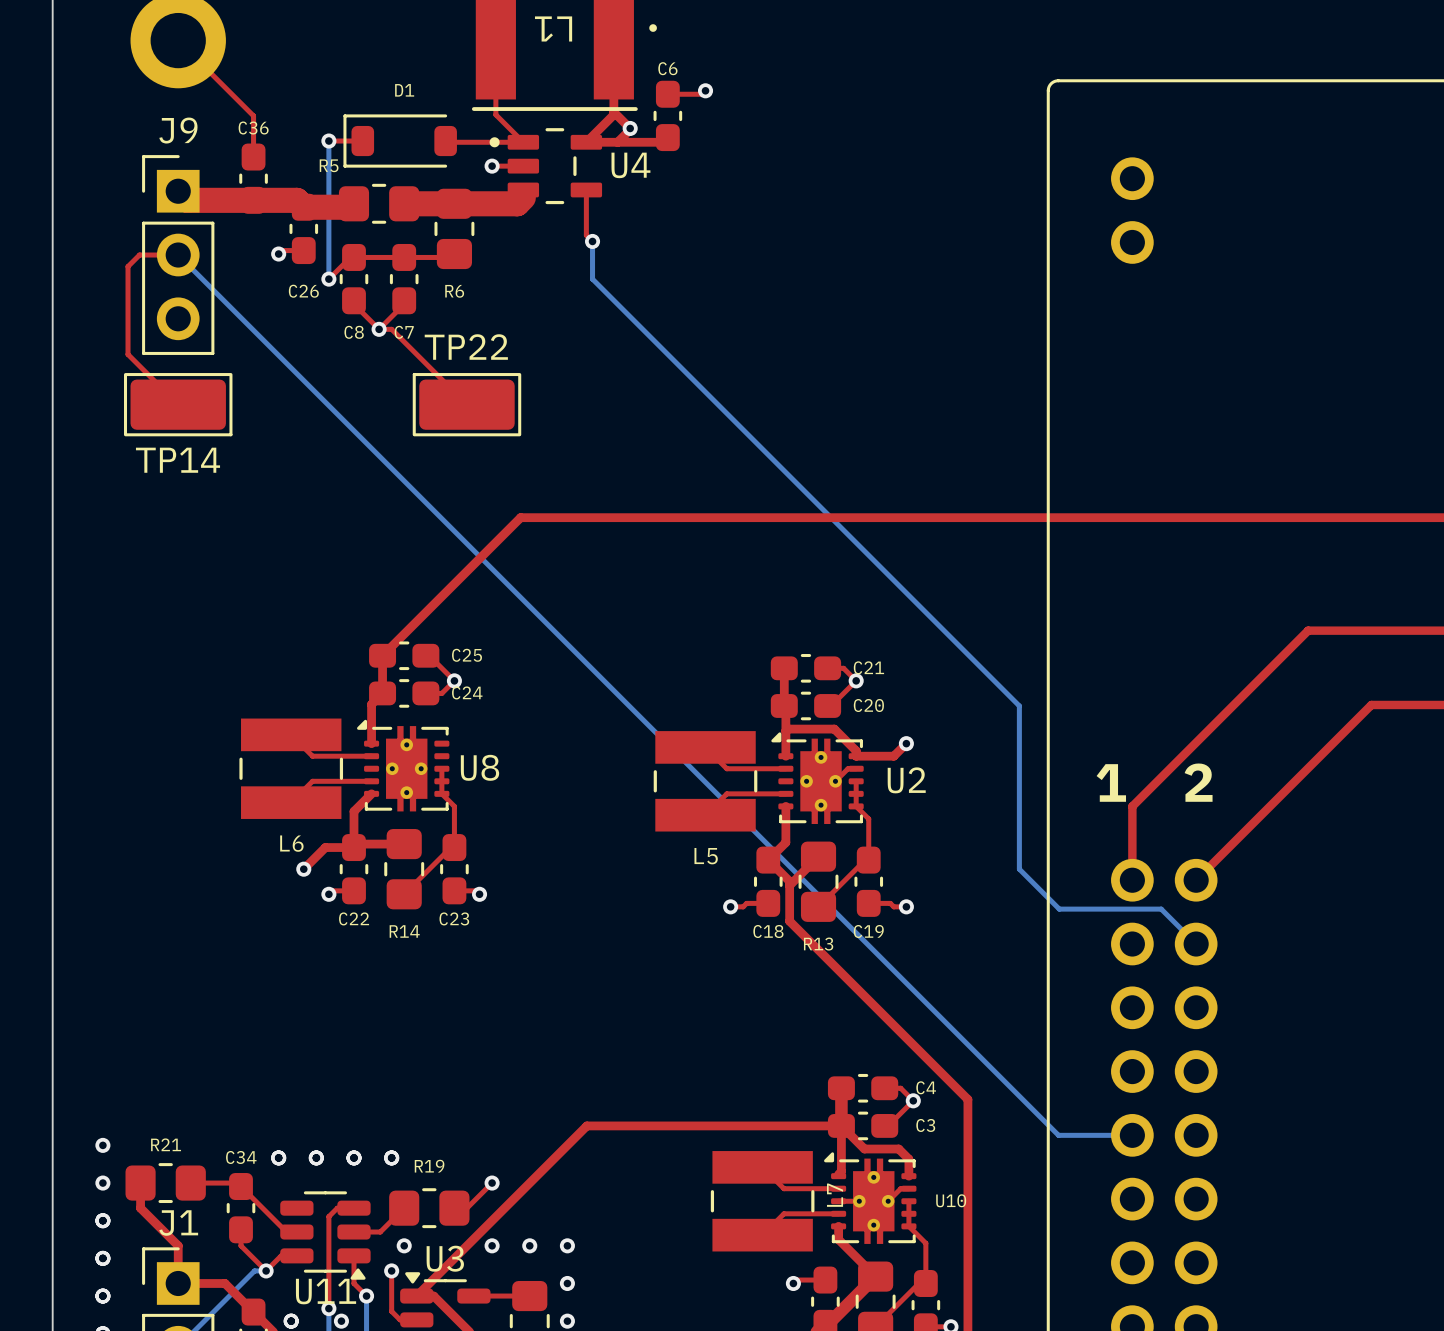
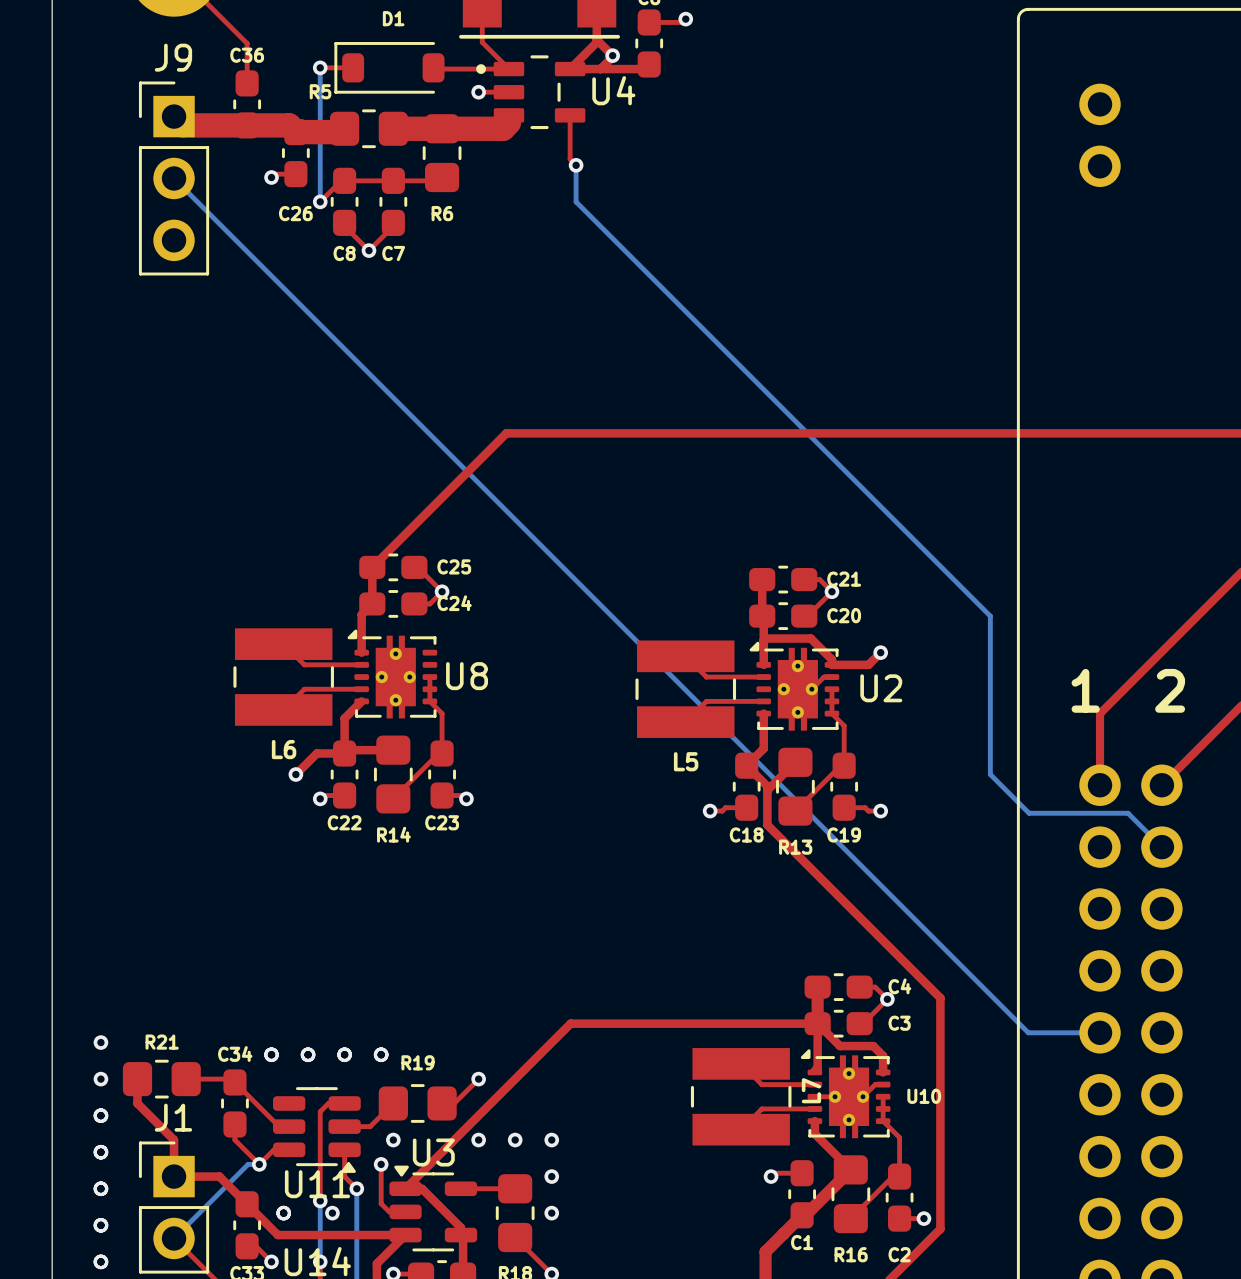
top track: (178, 255) (139, 255) (128, 266) (128, 354) (178, 404) -> none
top track: (379, 329) (391, 329) (466, 404) -> none
TP14: (178, 404) -> none
TP22: (466, 404) -> none

